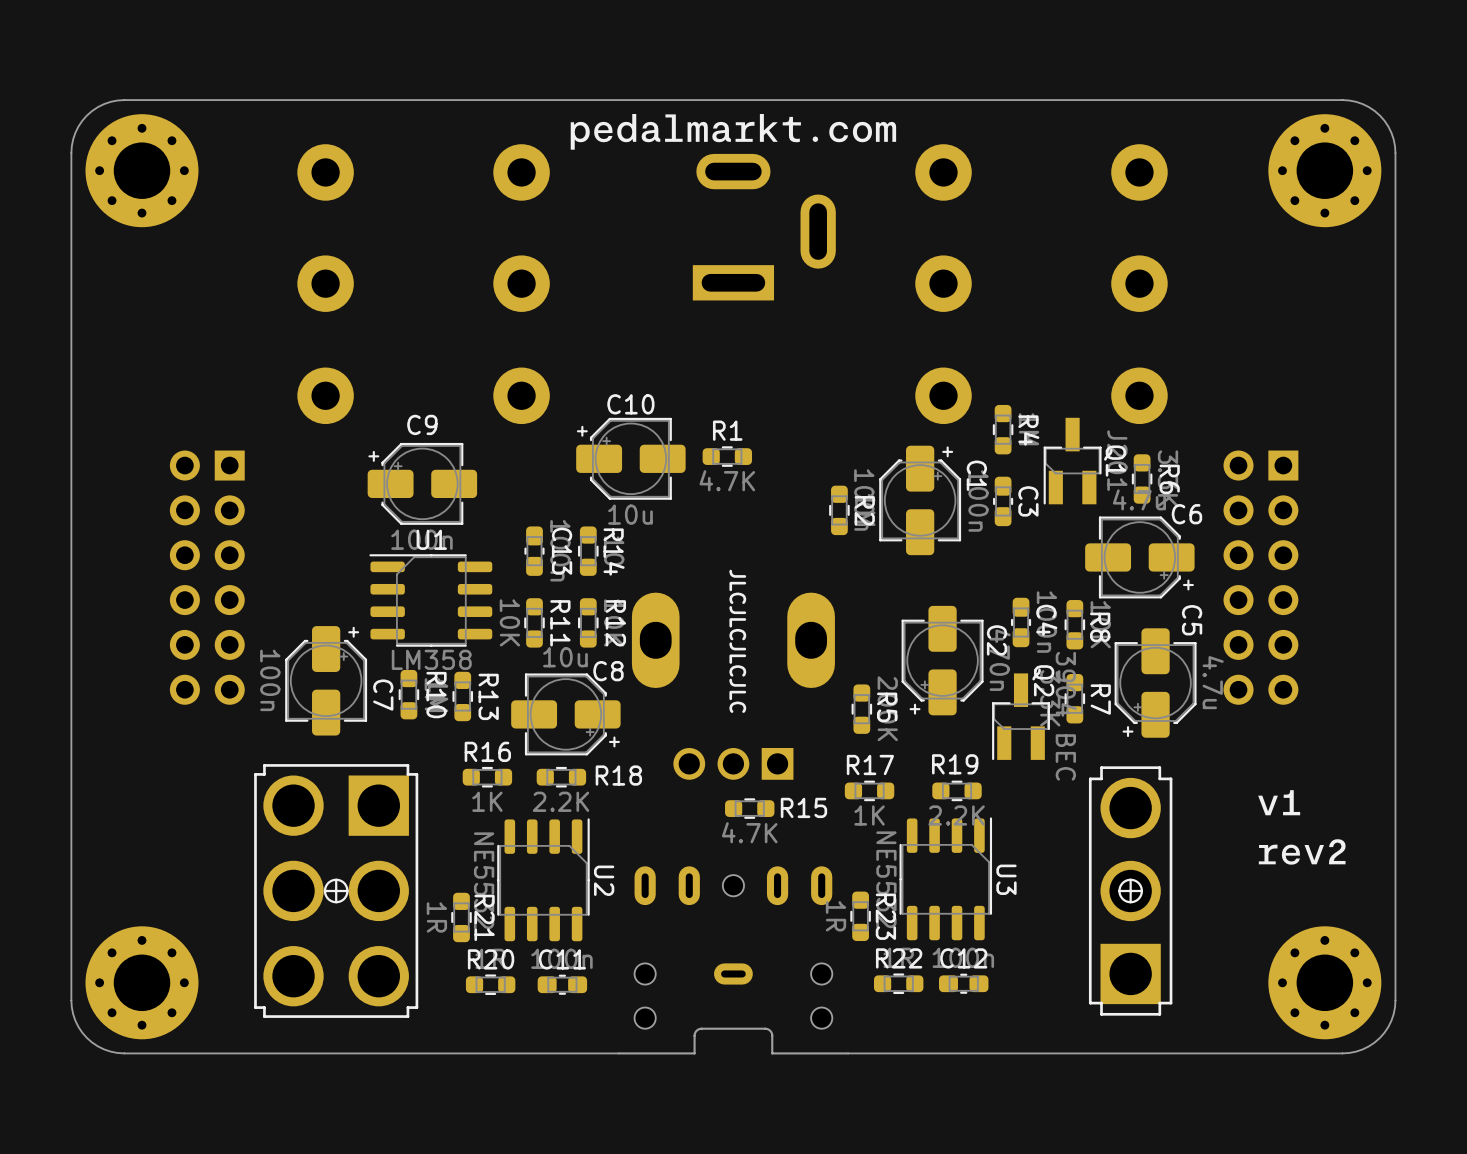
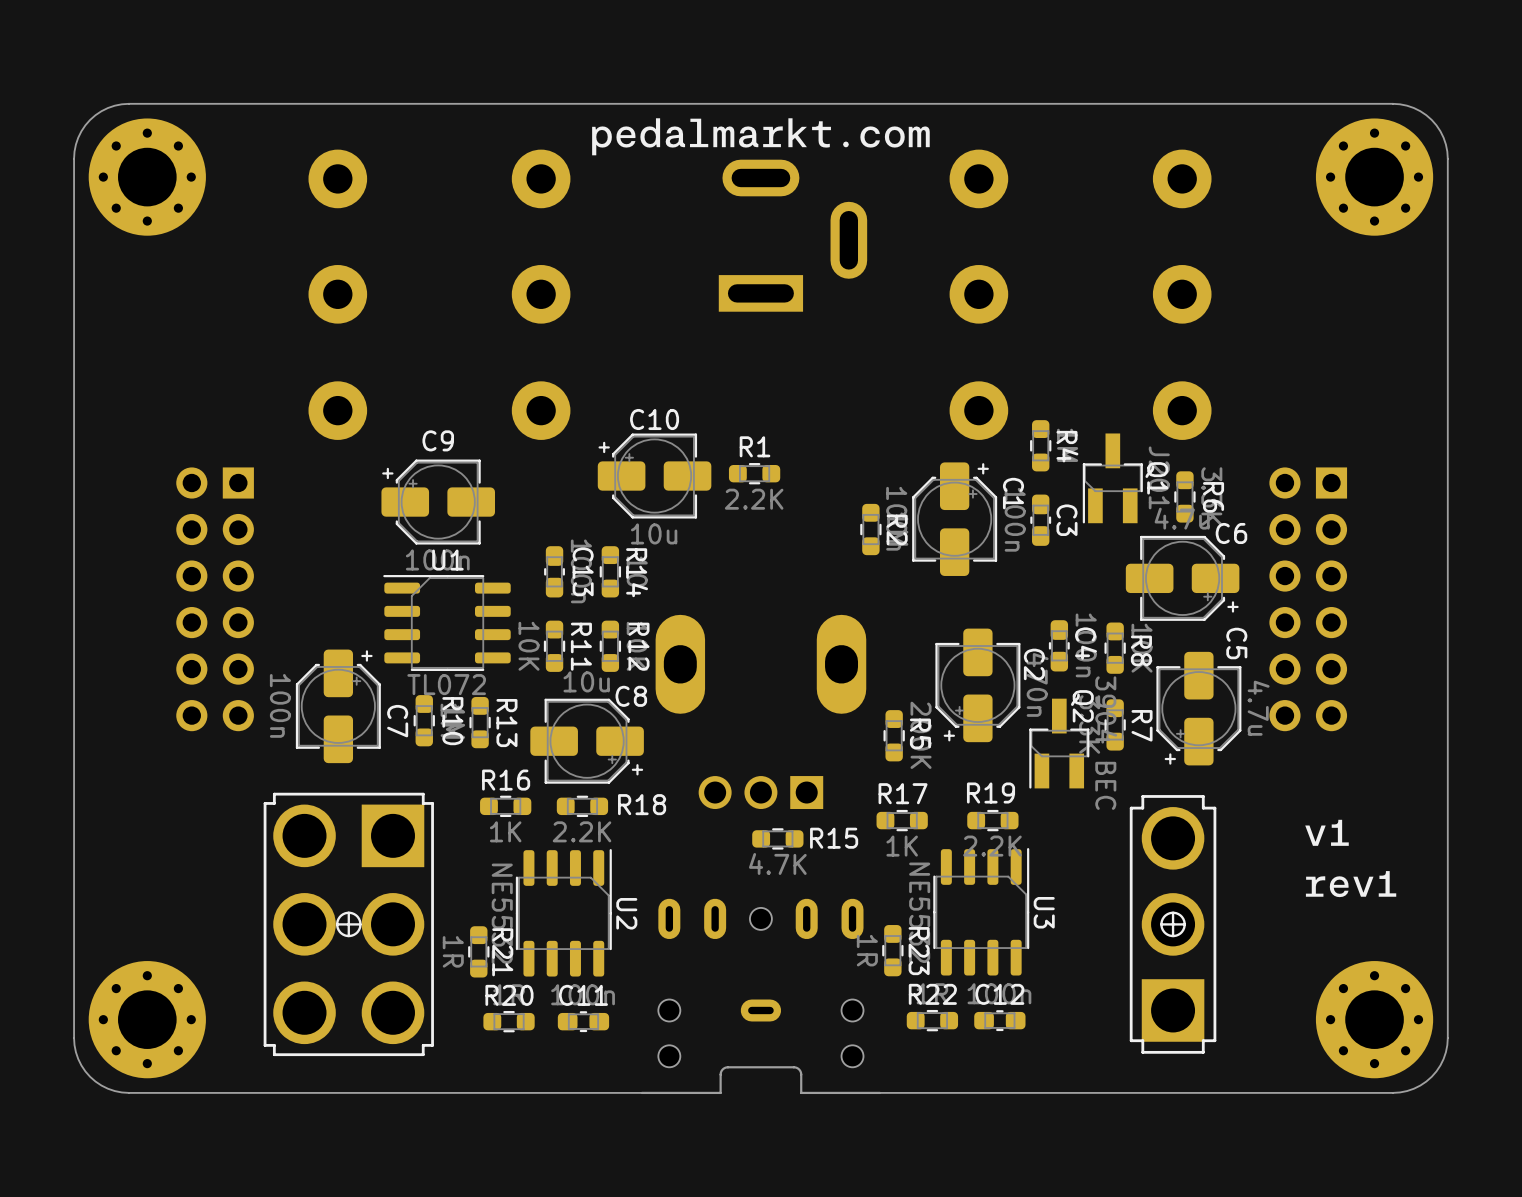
R1 value: 4.7K (727, 480) -> 2.2K (754, 499)
text: JLCJLCJLCJLC (737, 641) -> none
U1 value: LM358 (431, 659) -> TL072 (446, 684)
drawing shape: [1258, 790, 1346, 865] -> [1305, 819, 1397, 898]

